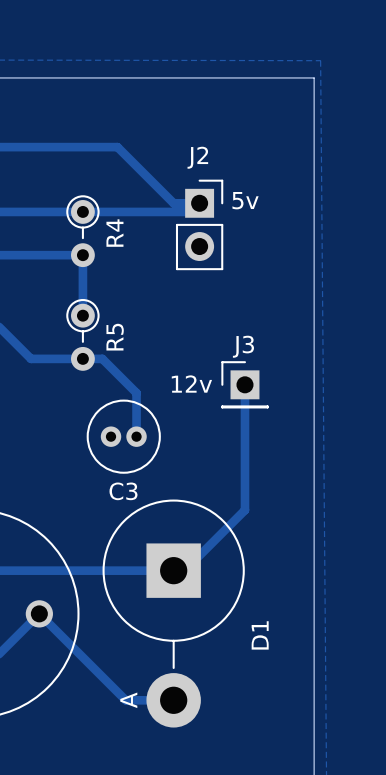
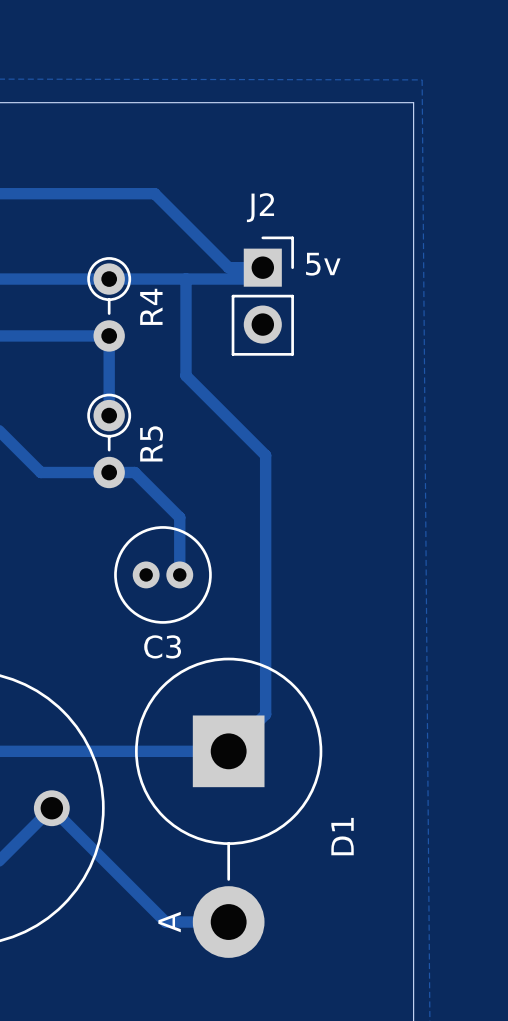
track: none -> (185, 279) (185, 375) (265, 455) (265, 714) (228, 751)
text: 12v (191, 384) -> none
track: (244, 384) (244, 510) (184, 570) -> none
J3: (244, 384) -> none

